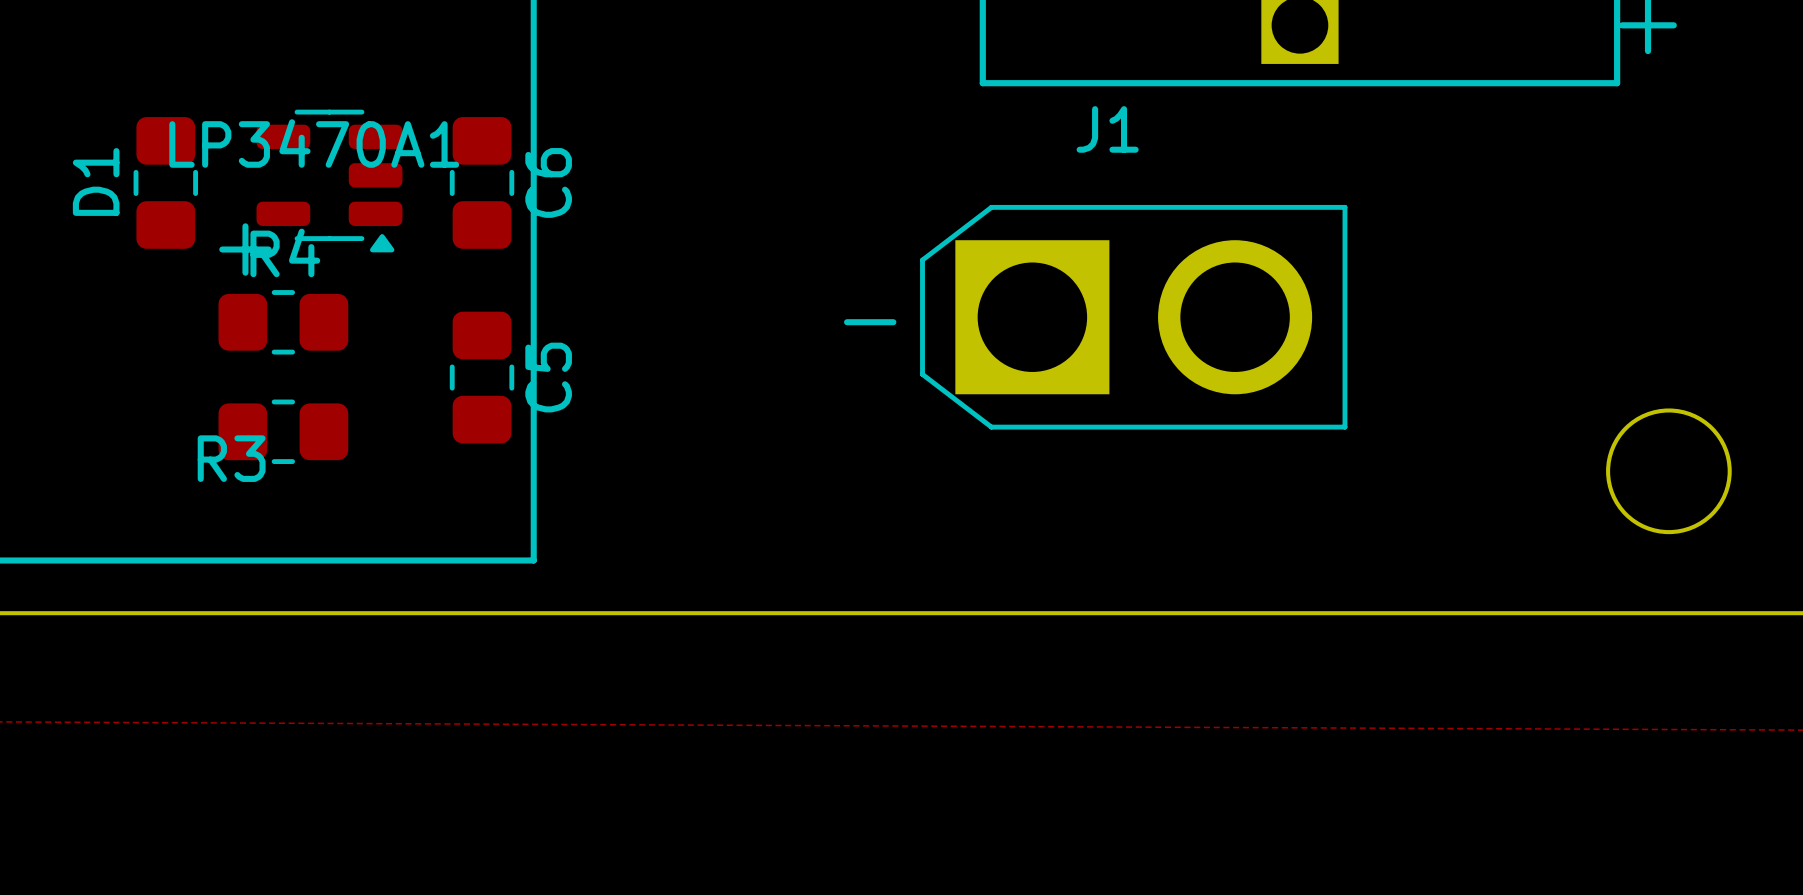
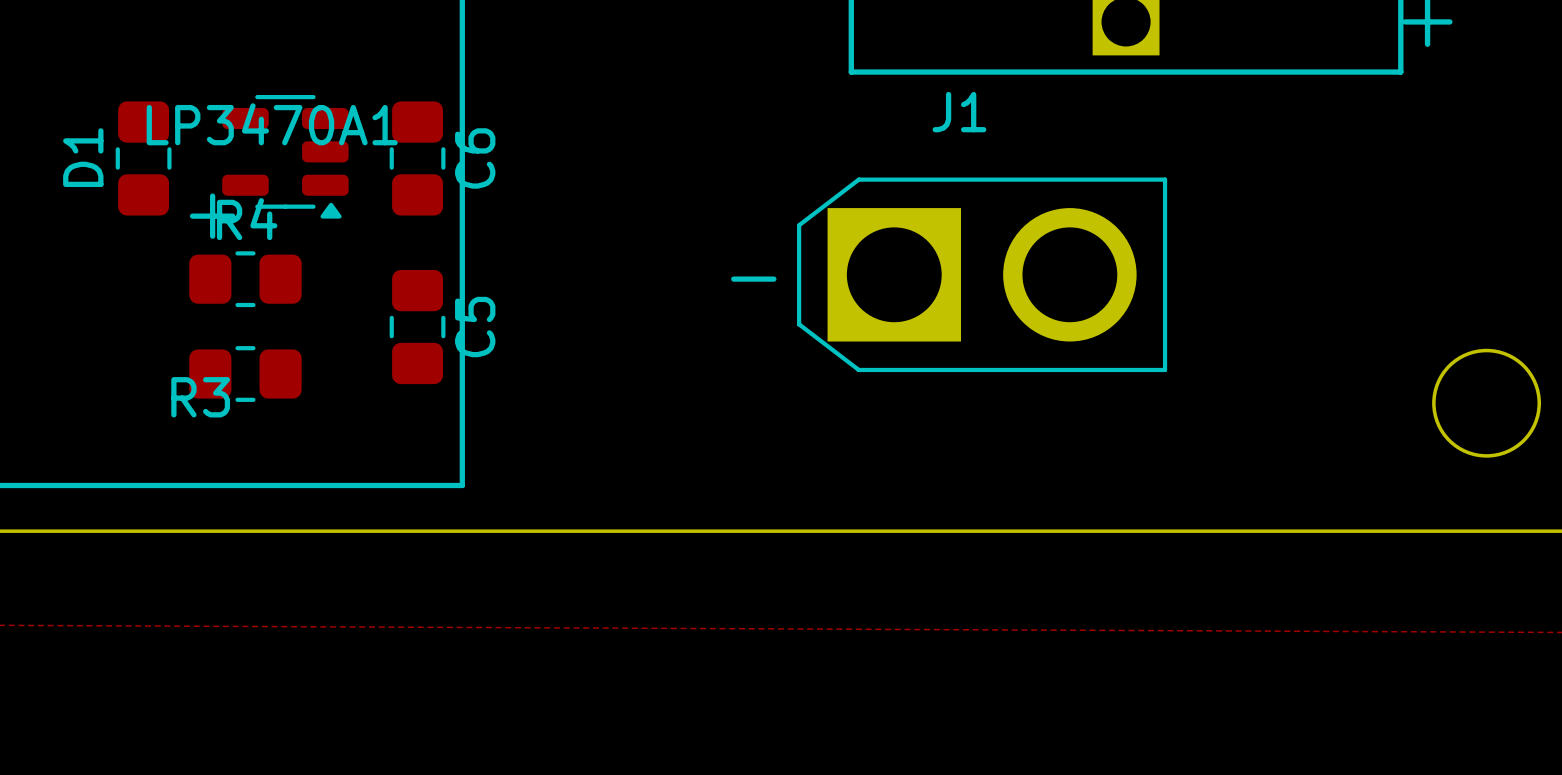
round board edge position: (1668, 471) -> (1486, 403)

